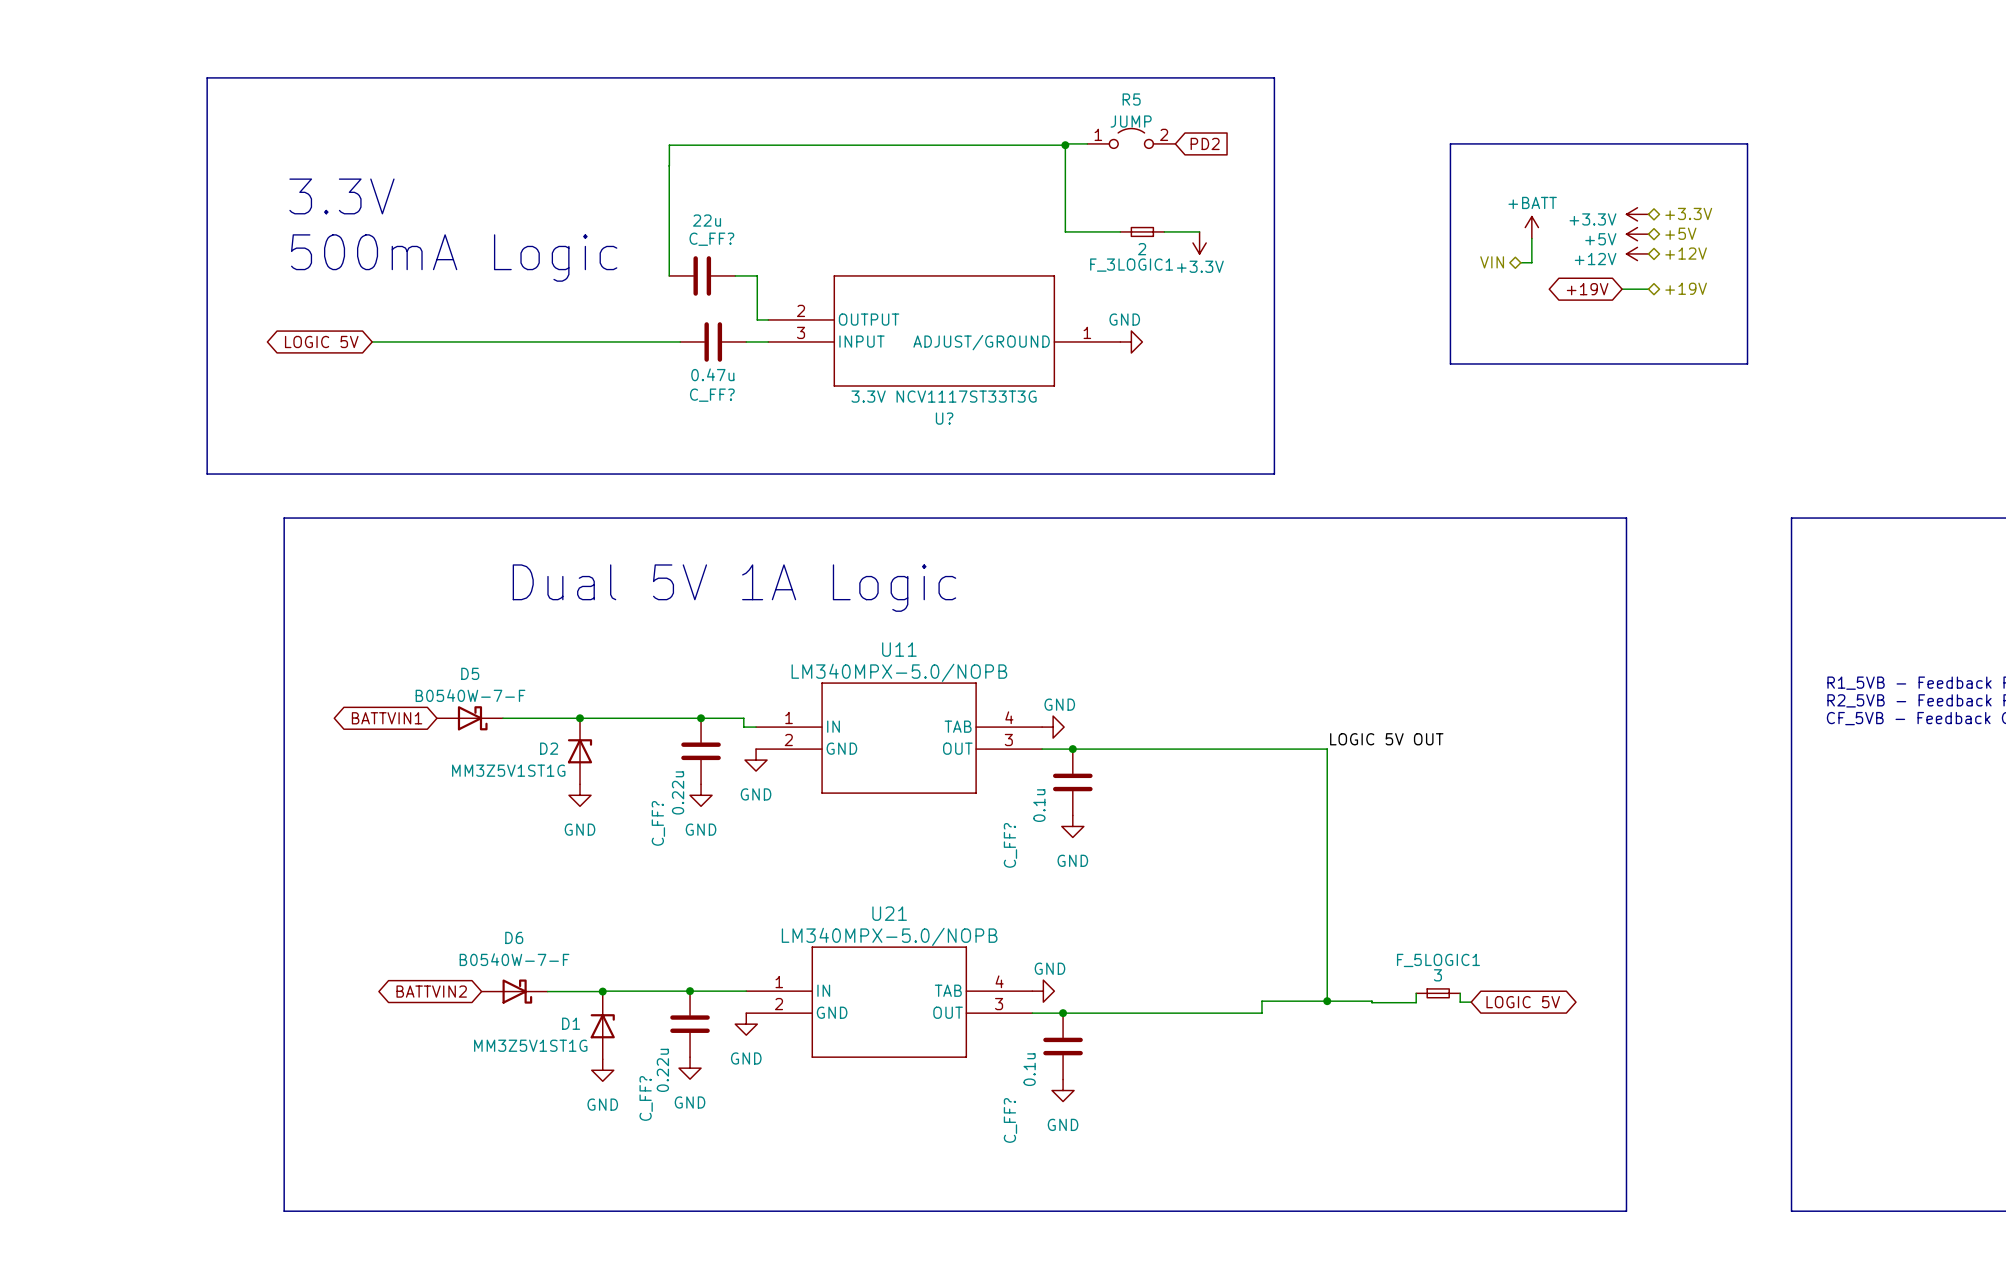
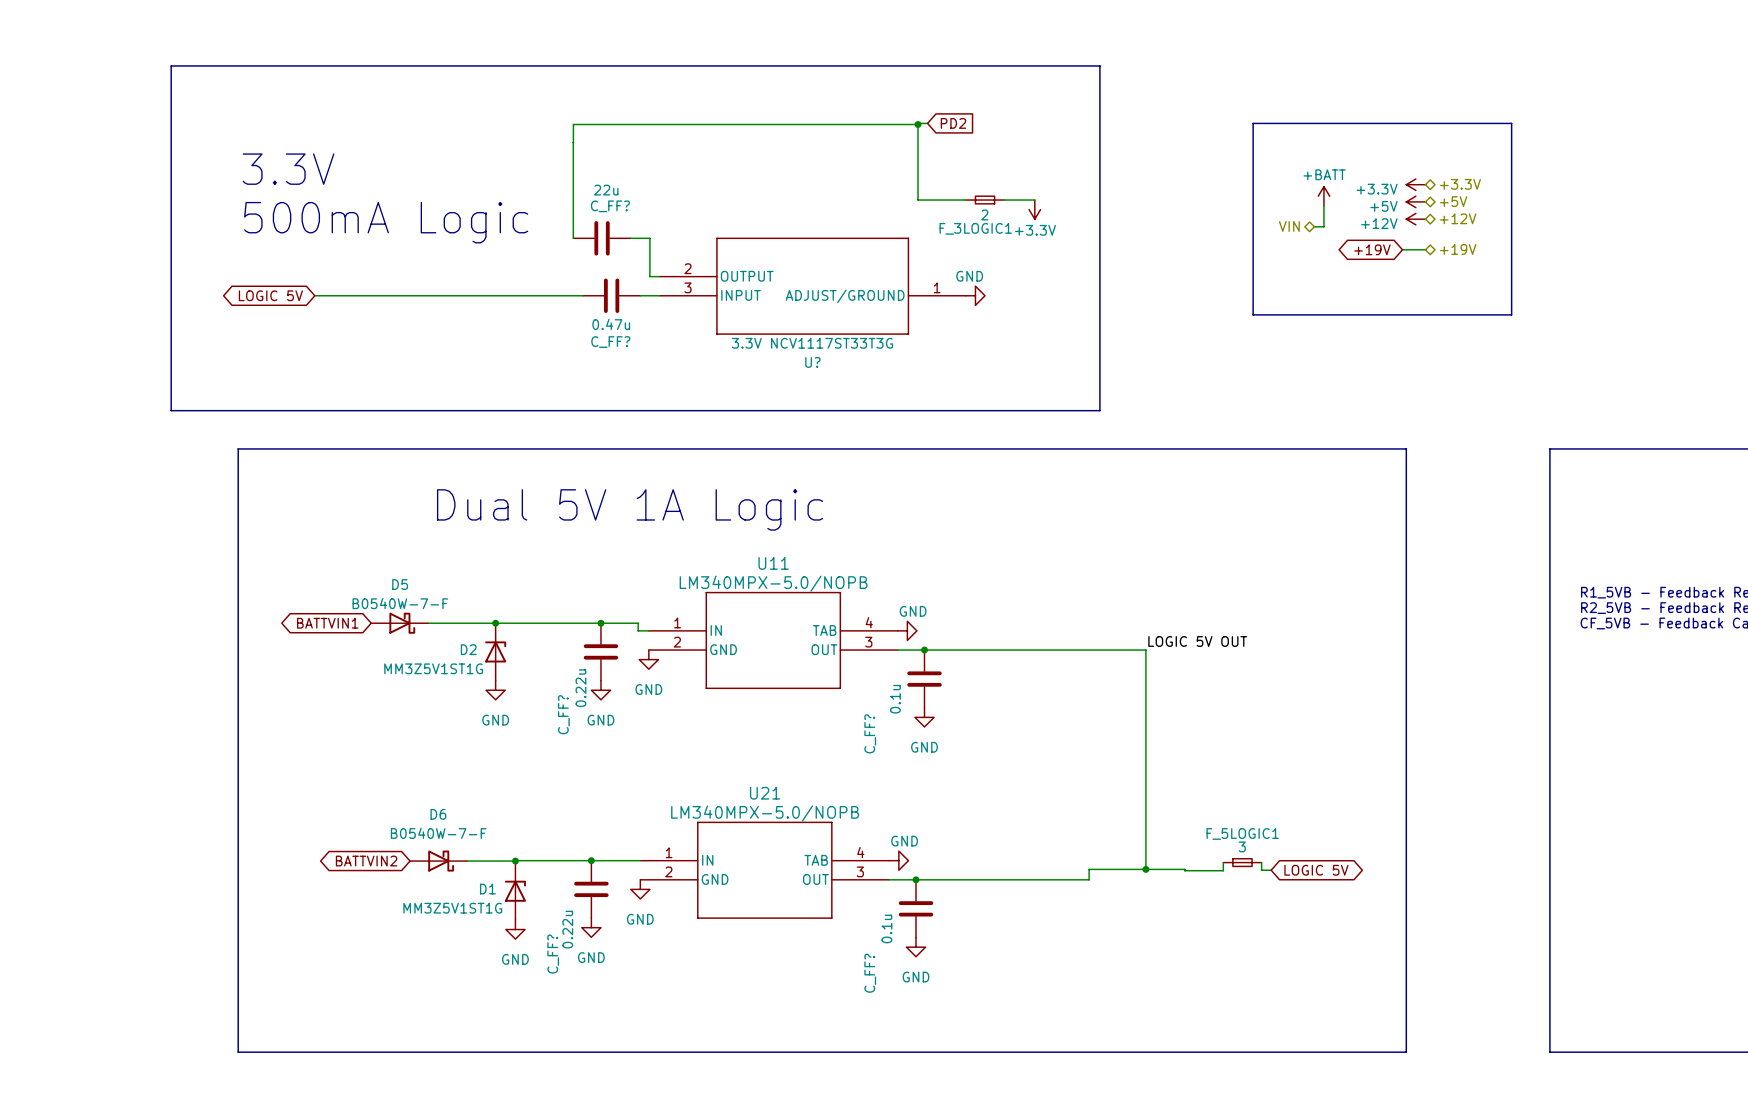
R5: JUMP (1131, 138) -> none
wire: (1076, 143) (1087, 143) -> none
global label position: PD2 (1205, 143) -> PD2 (953, 123)

